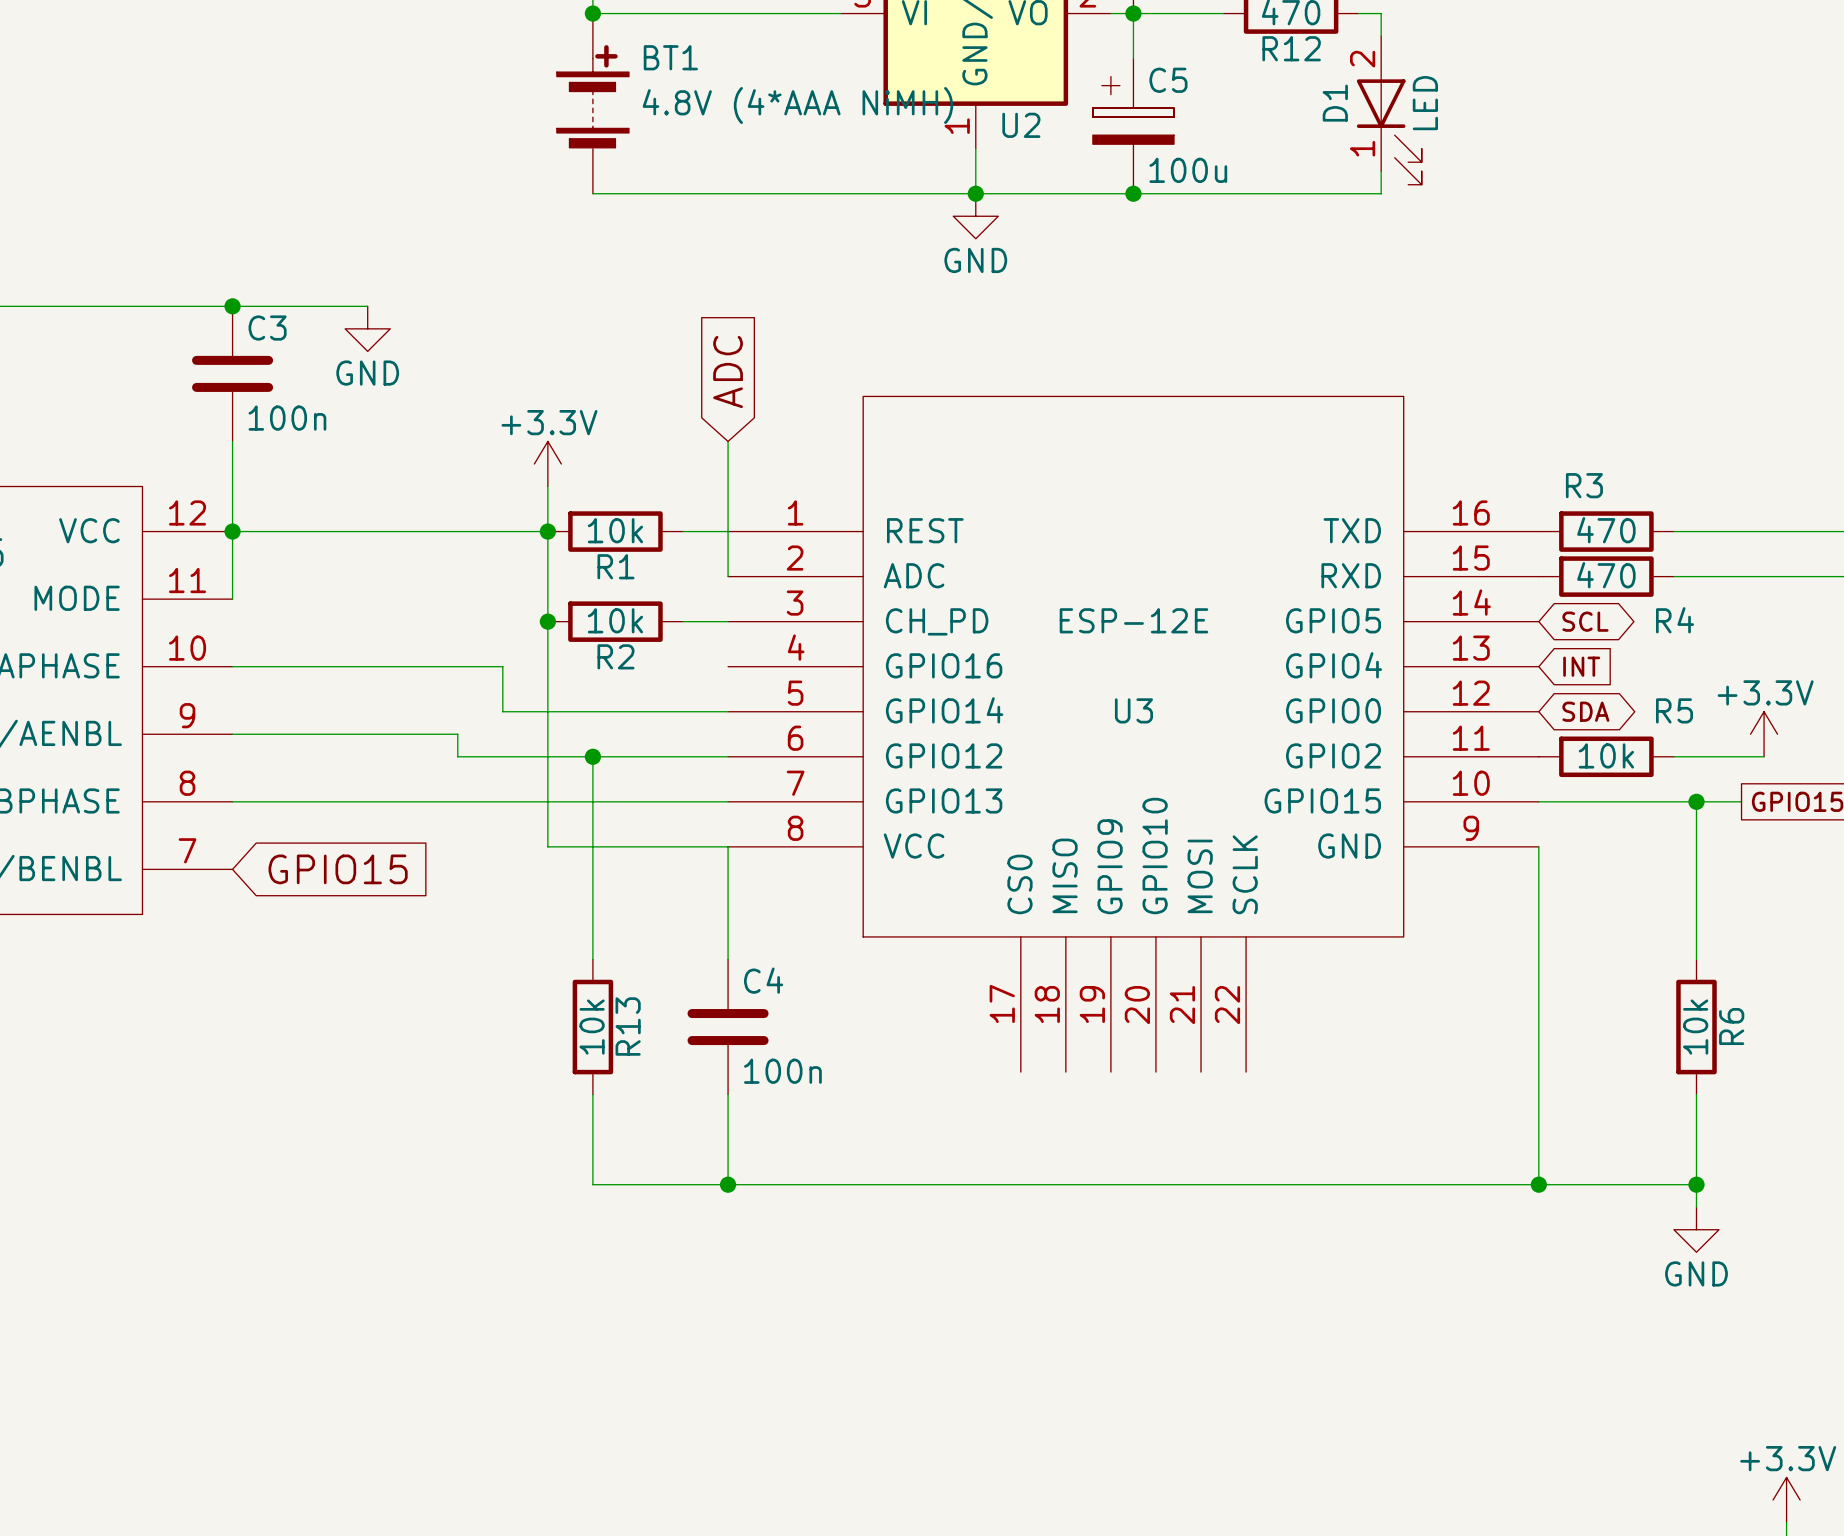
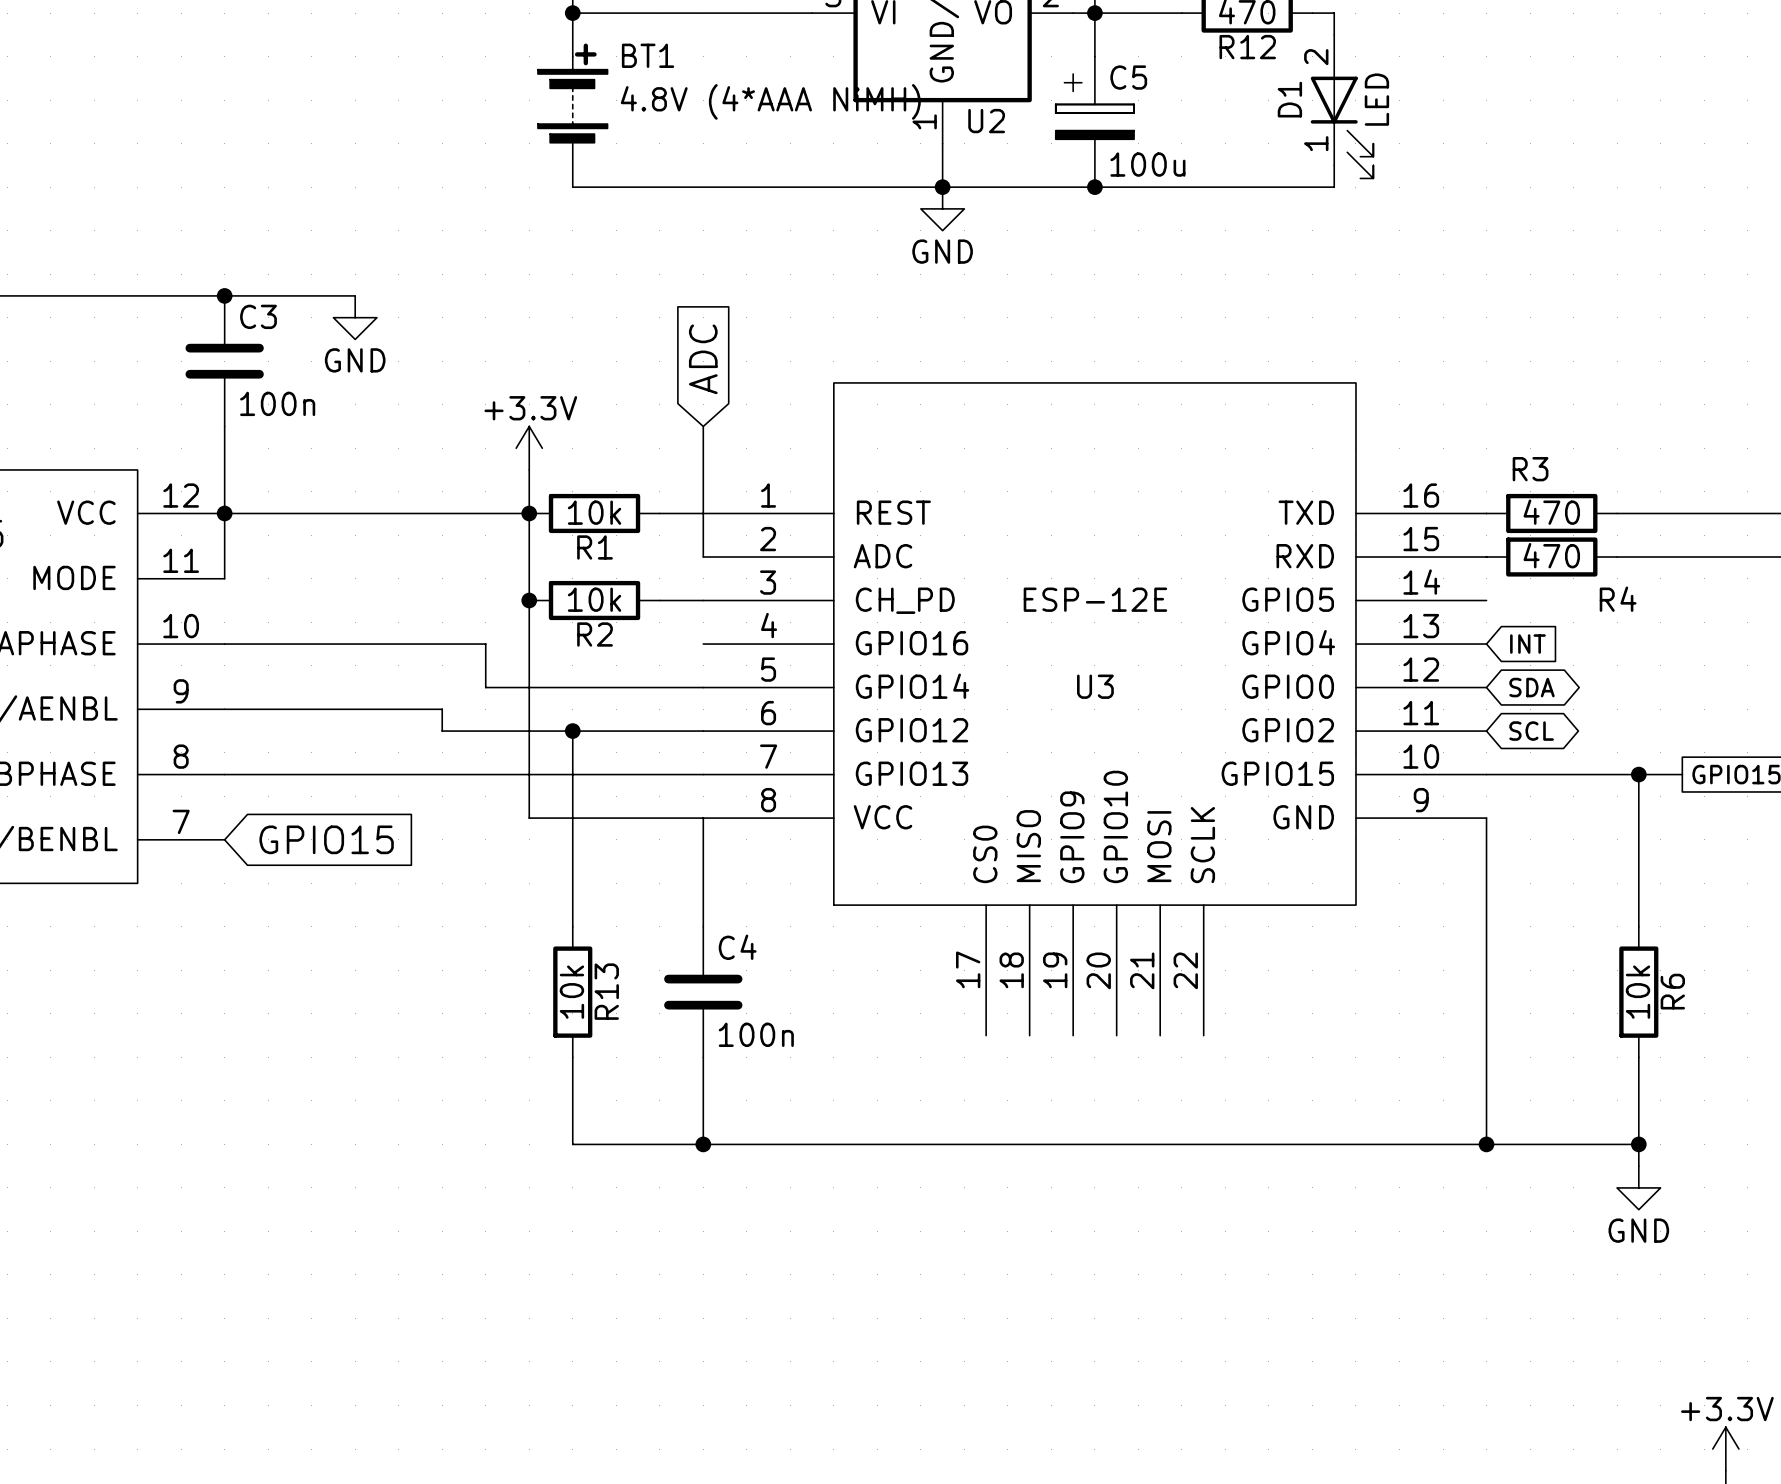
global label position: SCL (1585, 621) -> SCL (1531, 731)
power symbol: +3.3V (1764, 734) -> none
R5: 10k (1606, 756) -> none
wire: (1673, 756) (1764, 756) -> none

